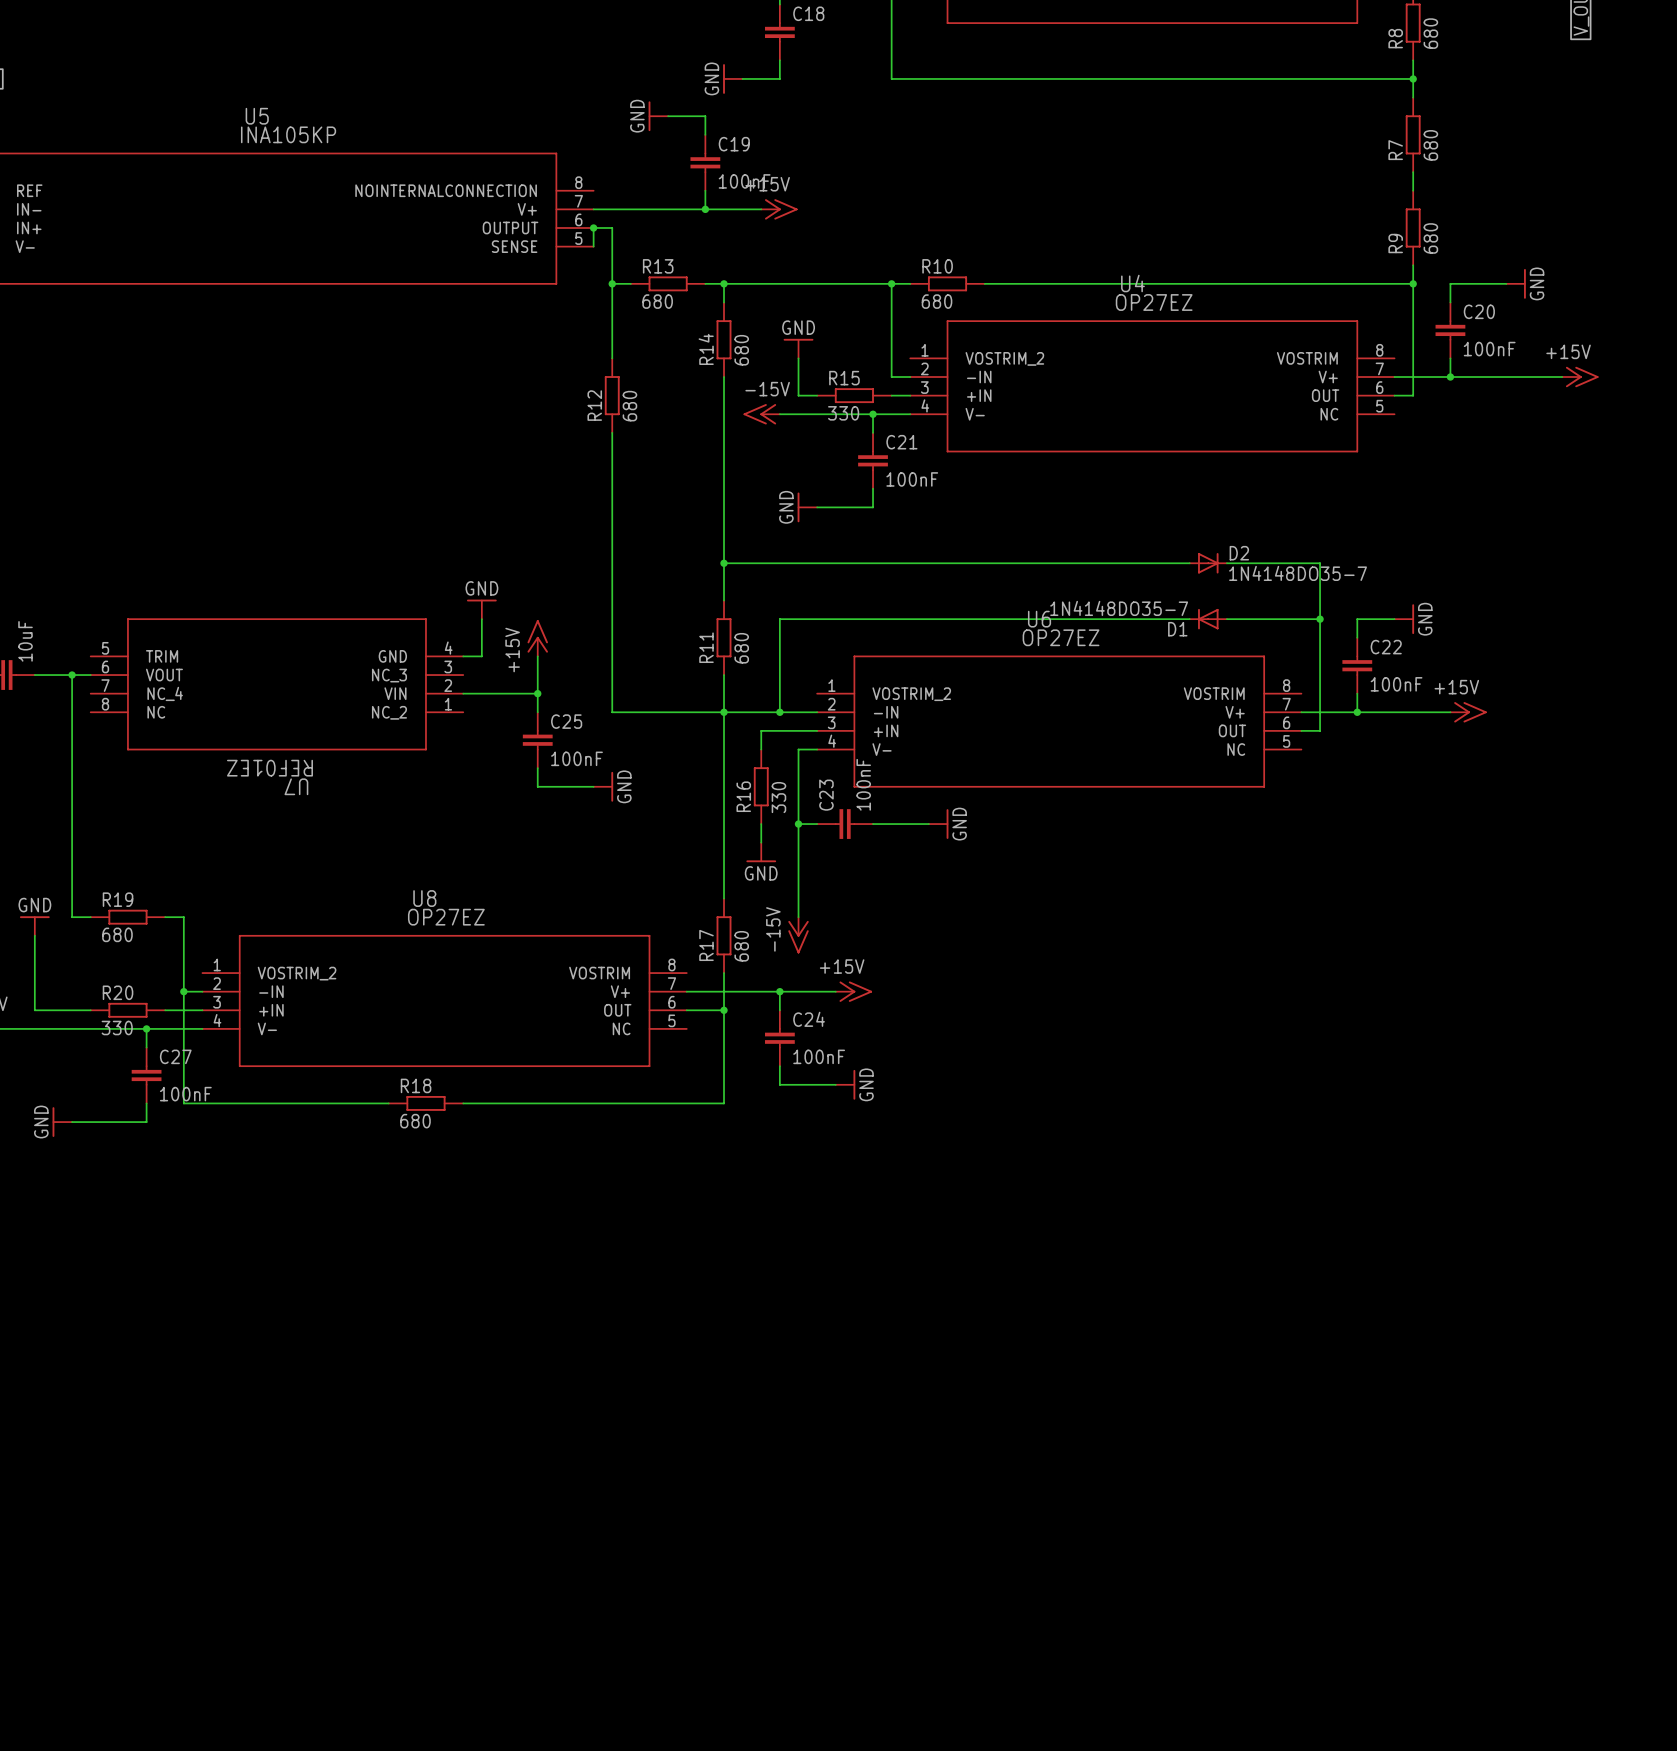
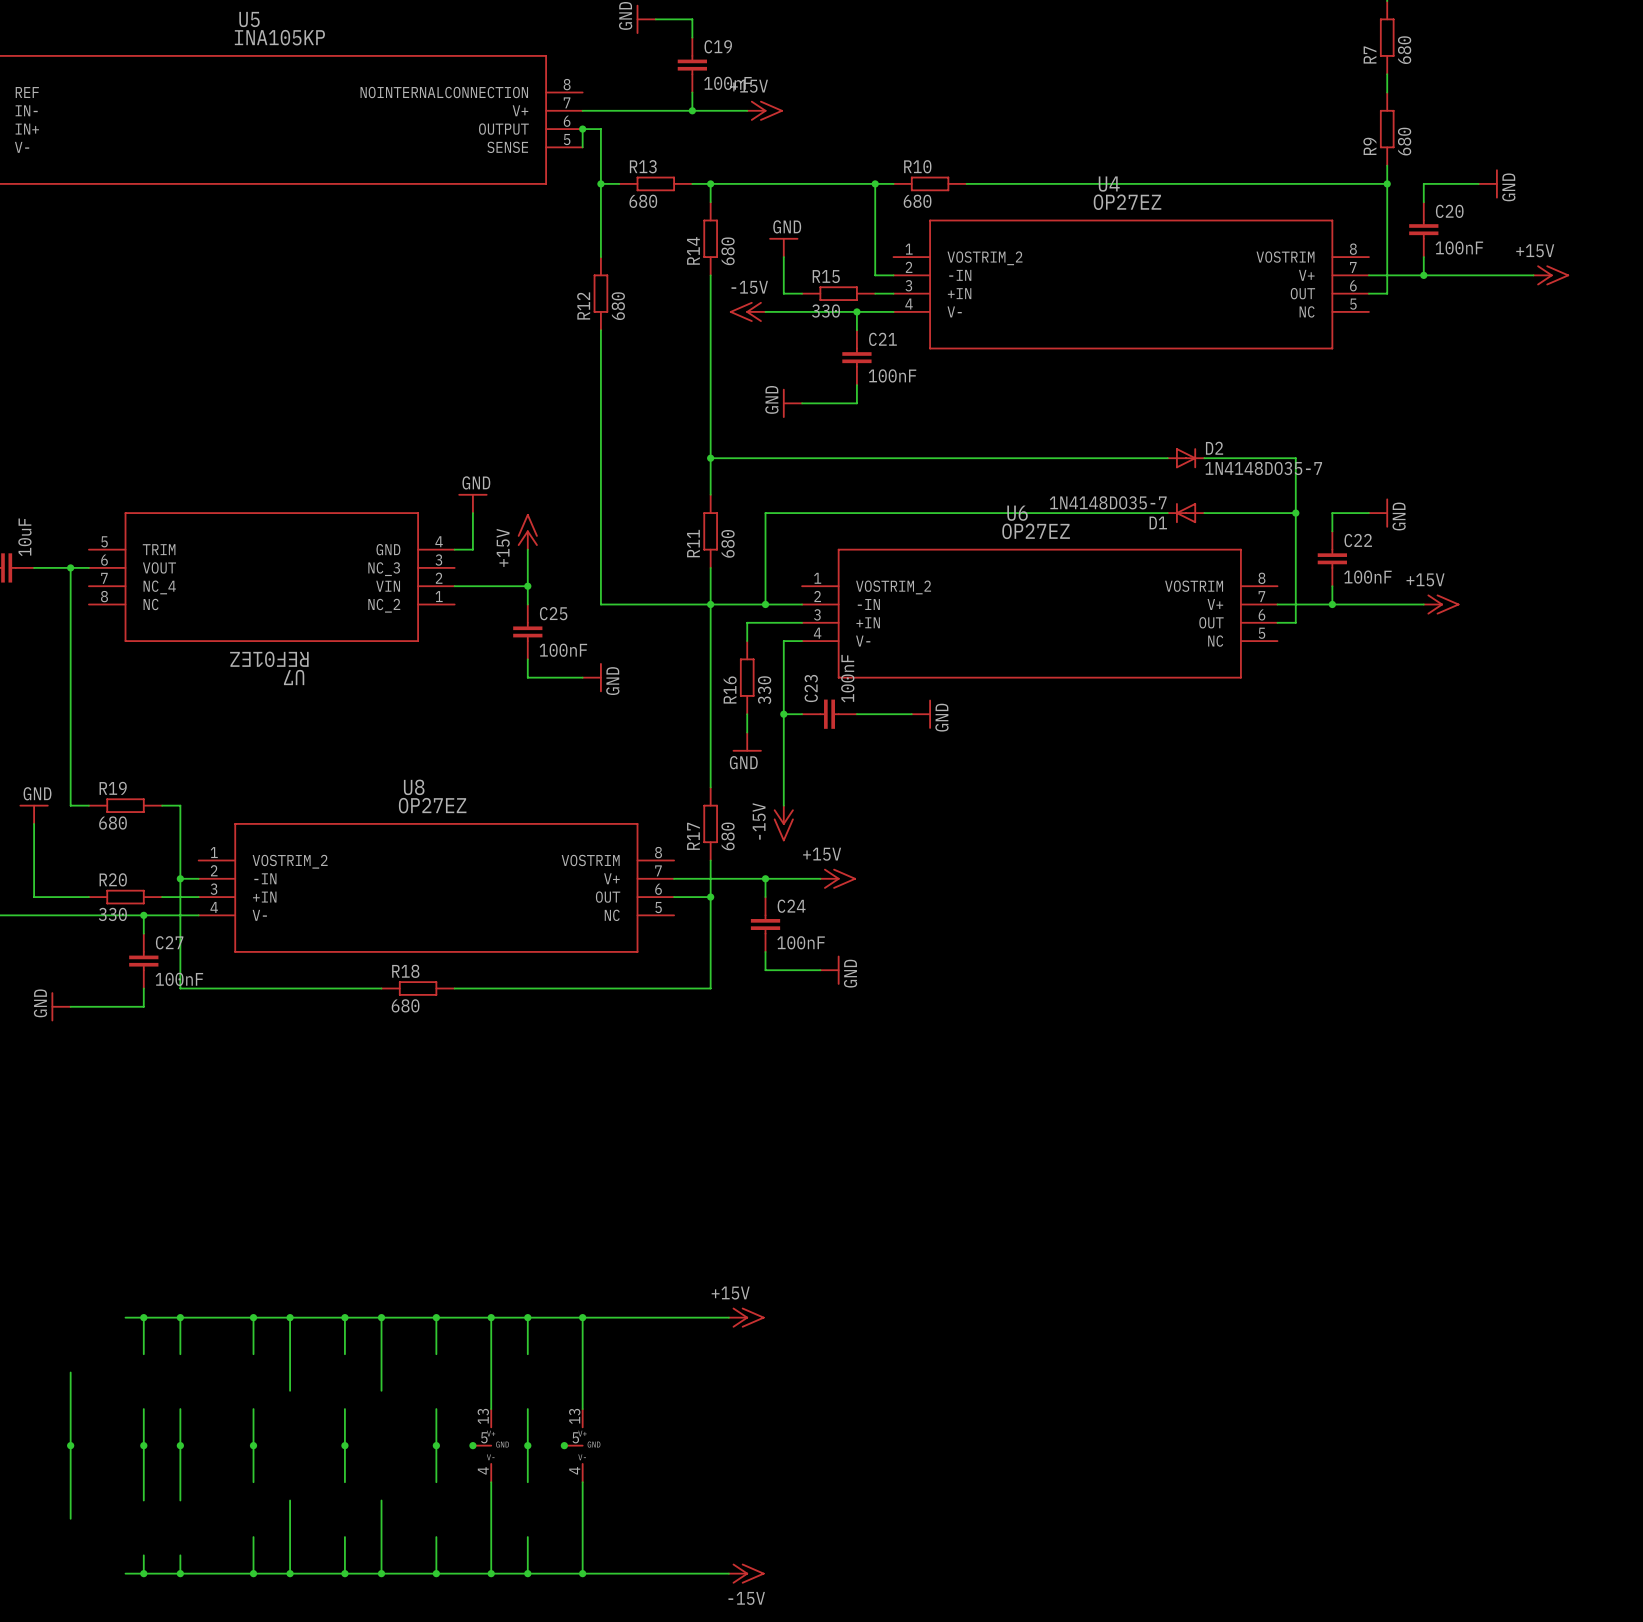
wire: none -> (125, 1317) (728, 1317)
wire: none -> (143, 1317) (143, 1354)
junction: none -> (143, 1317)
wire: none -> (180, 1317) (180, 1354)
junction: none -> (180, 1317)
wire: none -> (253, 1317) (253, 1354)
junction: none -> (253, 1317)
wire: none -> (290, 1317) (290, 1390)
junction: none -> (290, 1317)
wire: none -> (344, 1317) (344, 1354)
junction: none -> (344, 1317)
wire: none -> (381, 1317) (381, 1390)
junction: none -> (381, 1317)
wire: none -> (436, 1317) (436, 1354)
junction: none -> (436, 1317)
wire: none -> (491, 1317) (491, 1409)
junction: none -> (491, 1317)
wire: none -> (527, 1317) (527, 1354)
junction: none -> (527, 1317)
wire: none -> (582, 1317) (582, 1409)
junction: none -> (582, 1317)
power symbol: none -> +15V (746, 1317)
wire: none -> (70, 1372) (70, 1518)
wire: none -> (143, 1409) (143, 1500)
wire: none -> (180, 1409) (180, 1500)
wire: none -> (253, 1409) (253, 1482)
wire: none -> (344, 1409) (344, 1482)
wire: none -> (436, 1409) (436, 1482)
wire: none -> (527, 1409) (527, 1482)
junction: none -> (70, 1445)
junction: none -> (143, 1445)
junction: none -> (180, 1445)
junction: none -> (253, 1445)
junction: none -> (344, 1445)
junction: none -> (436, 1445)
junction: none -> (472, 1445)
part: none -> (482, 1445)
junction: none -> (527, 1445)
junction: none -> (564, 1445)
part: none -> (573, 1445)
wire: none -> (491, 1482) (491, 1573)
wire: none -> (582, 1482) (582, 1573)
wire: none -> (290, 1500) (290, 1573)
wire: none -> (381, 1500) (381, 1573)
wire: none -> (253, 1537) (253, 1573)
wire: none -> (344, 1537) (344, 1573)
wire: none -> (436, 1537) (436, 1573)
wire: none -> (527, 1537) (527, 1573)
wire: none -> (143, 1555) (143, 1573)
wire: none -> (180, 1555) (180, 1573)
wire: none -> (125, 1573) (728, 1573)
junction: none -> (143, 1573)
junction: none -> (180, 1573)
junction: none -> (253, 1573)
junction: none -> (290, 1573)
junction: none -> (344, 1573)
junction: none -> (381, 1573)
junction: none -> (436, 1573)
junction: none -> (491, 1573)
junction: none -> (527, 1573)
junction: none -> (582, 1573)
power symbol: none -> -15V (746, 1573)

